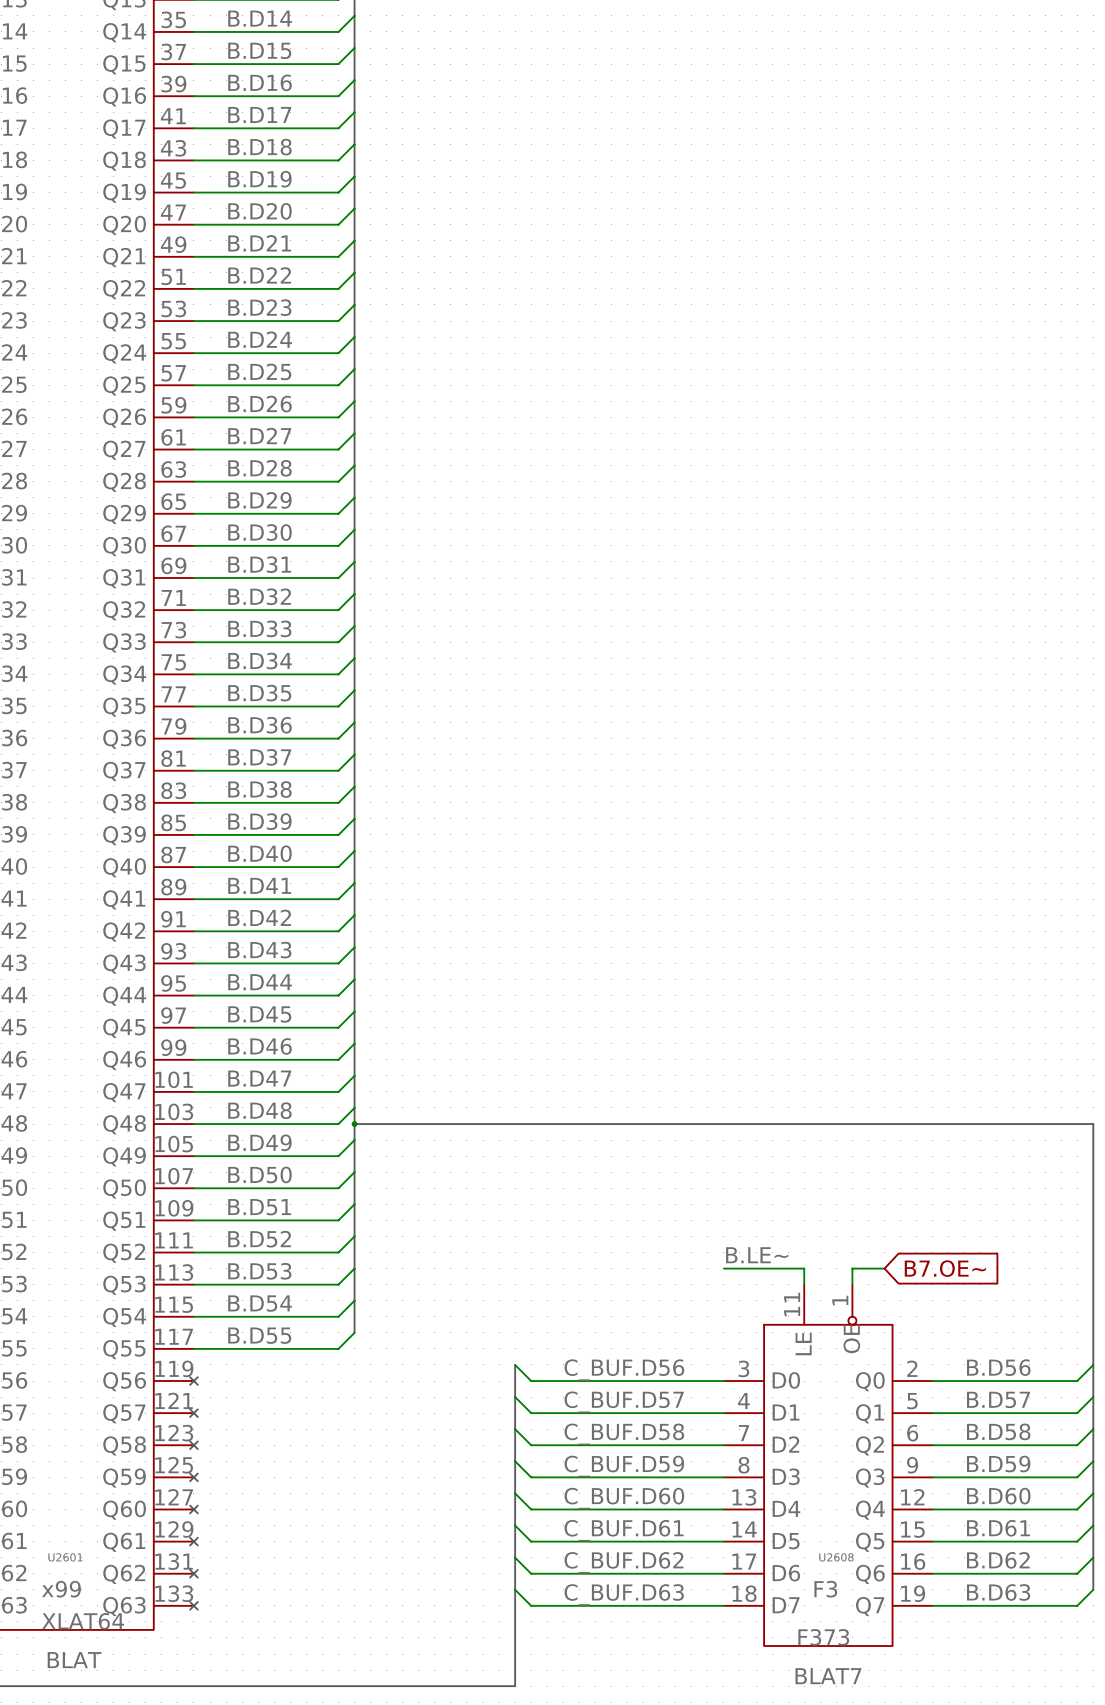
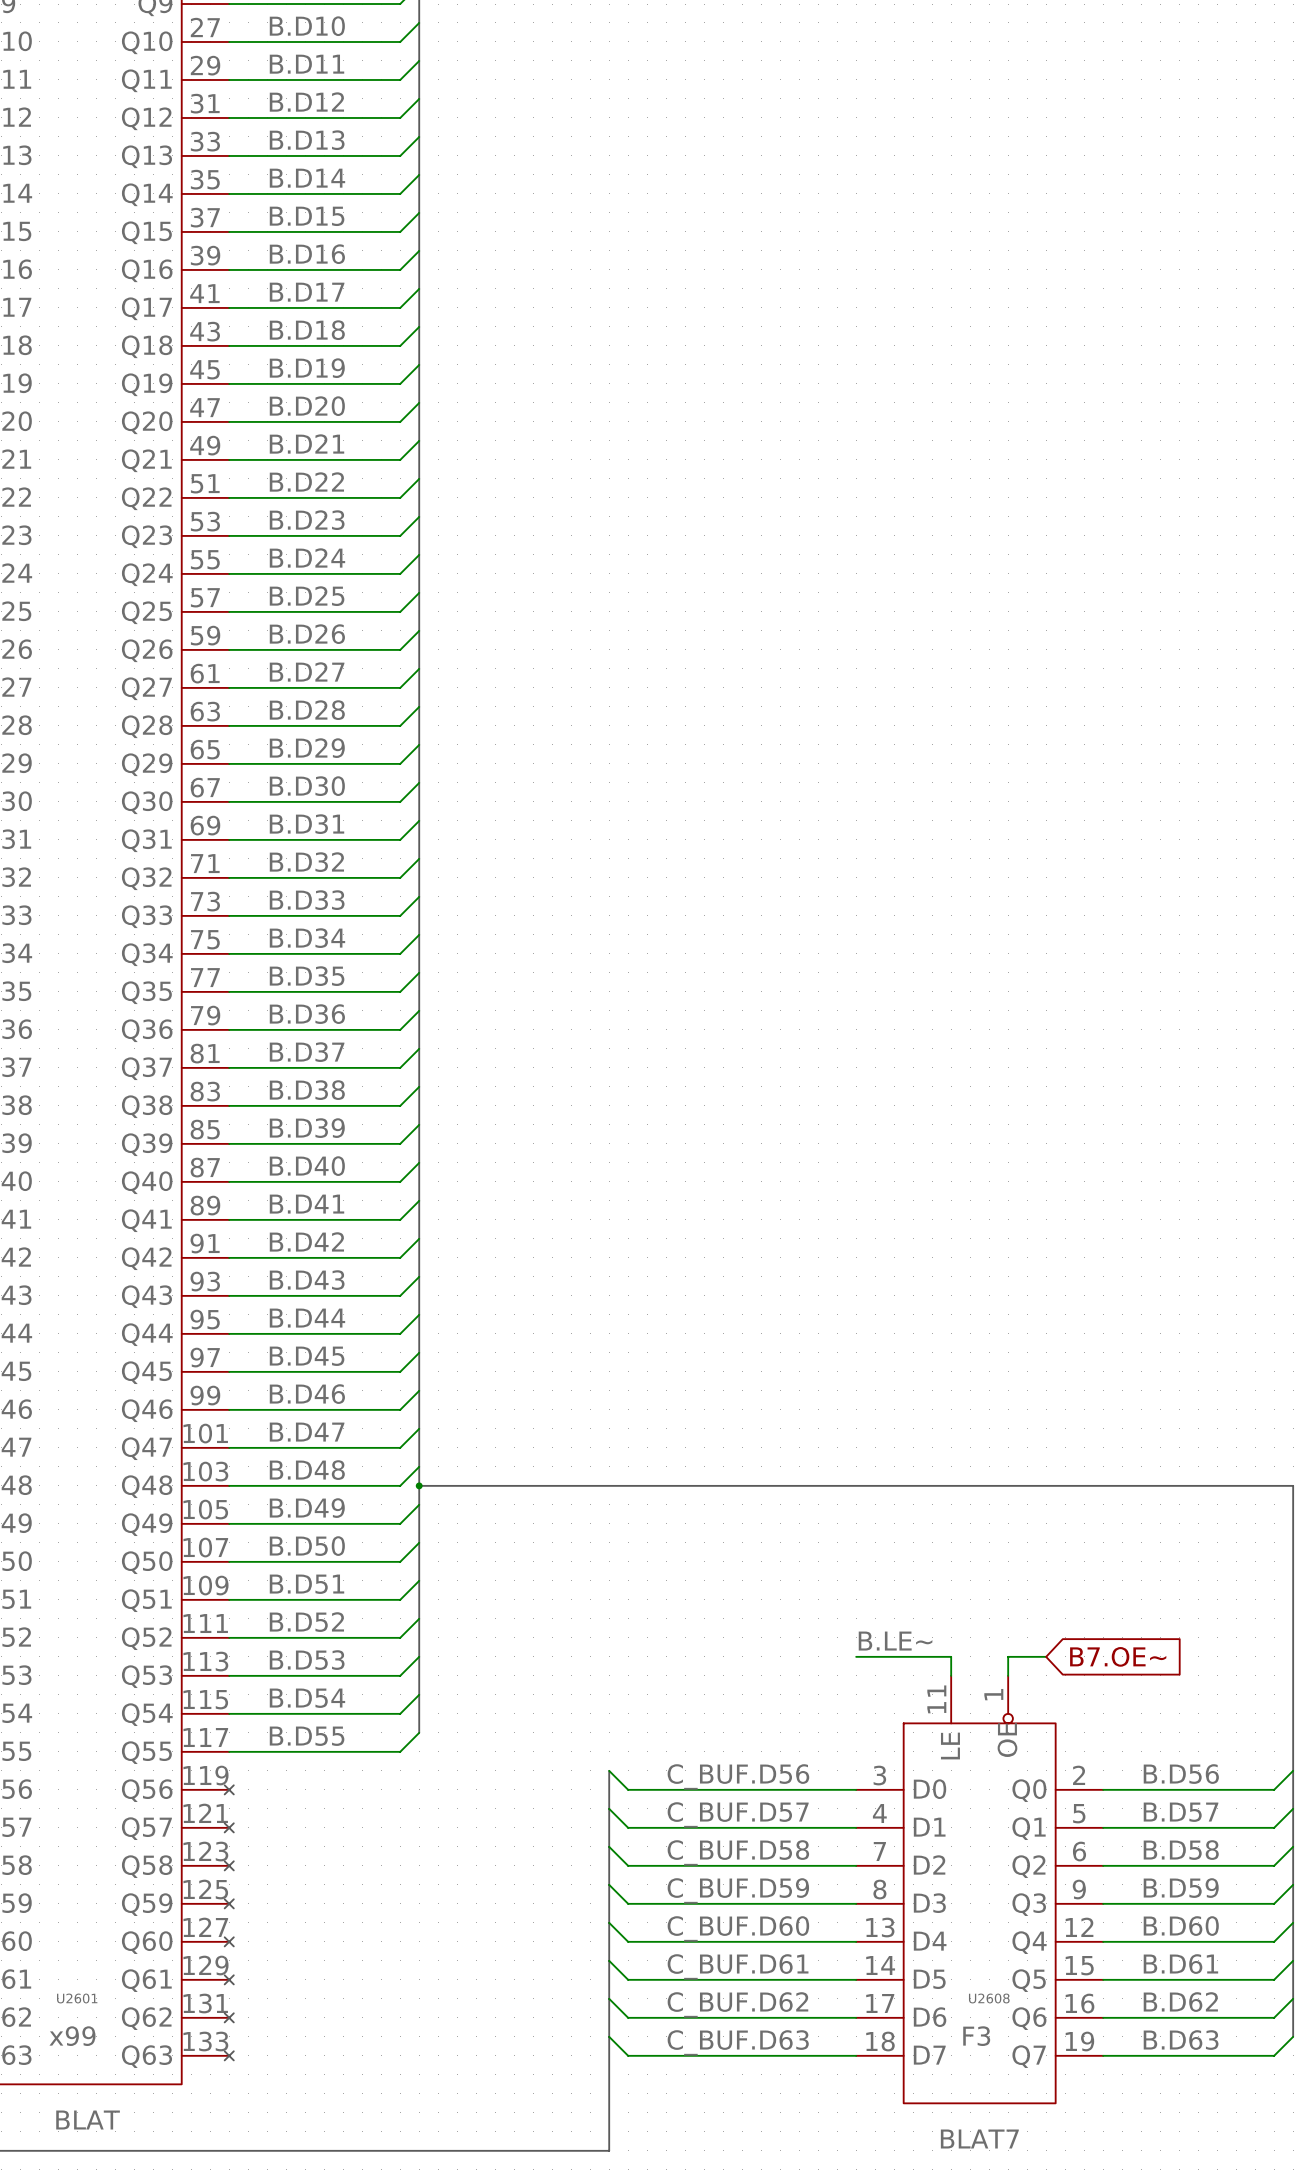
U2601 value: XLAT64 (83, 1621) -> none
U2608 value: F373 (823, 1637) -> none

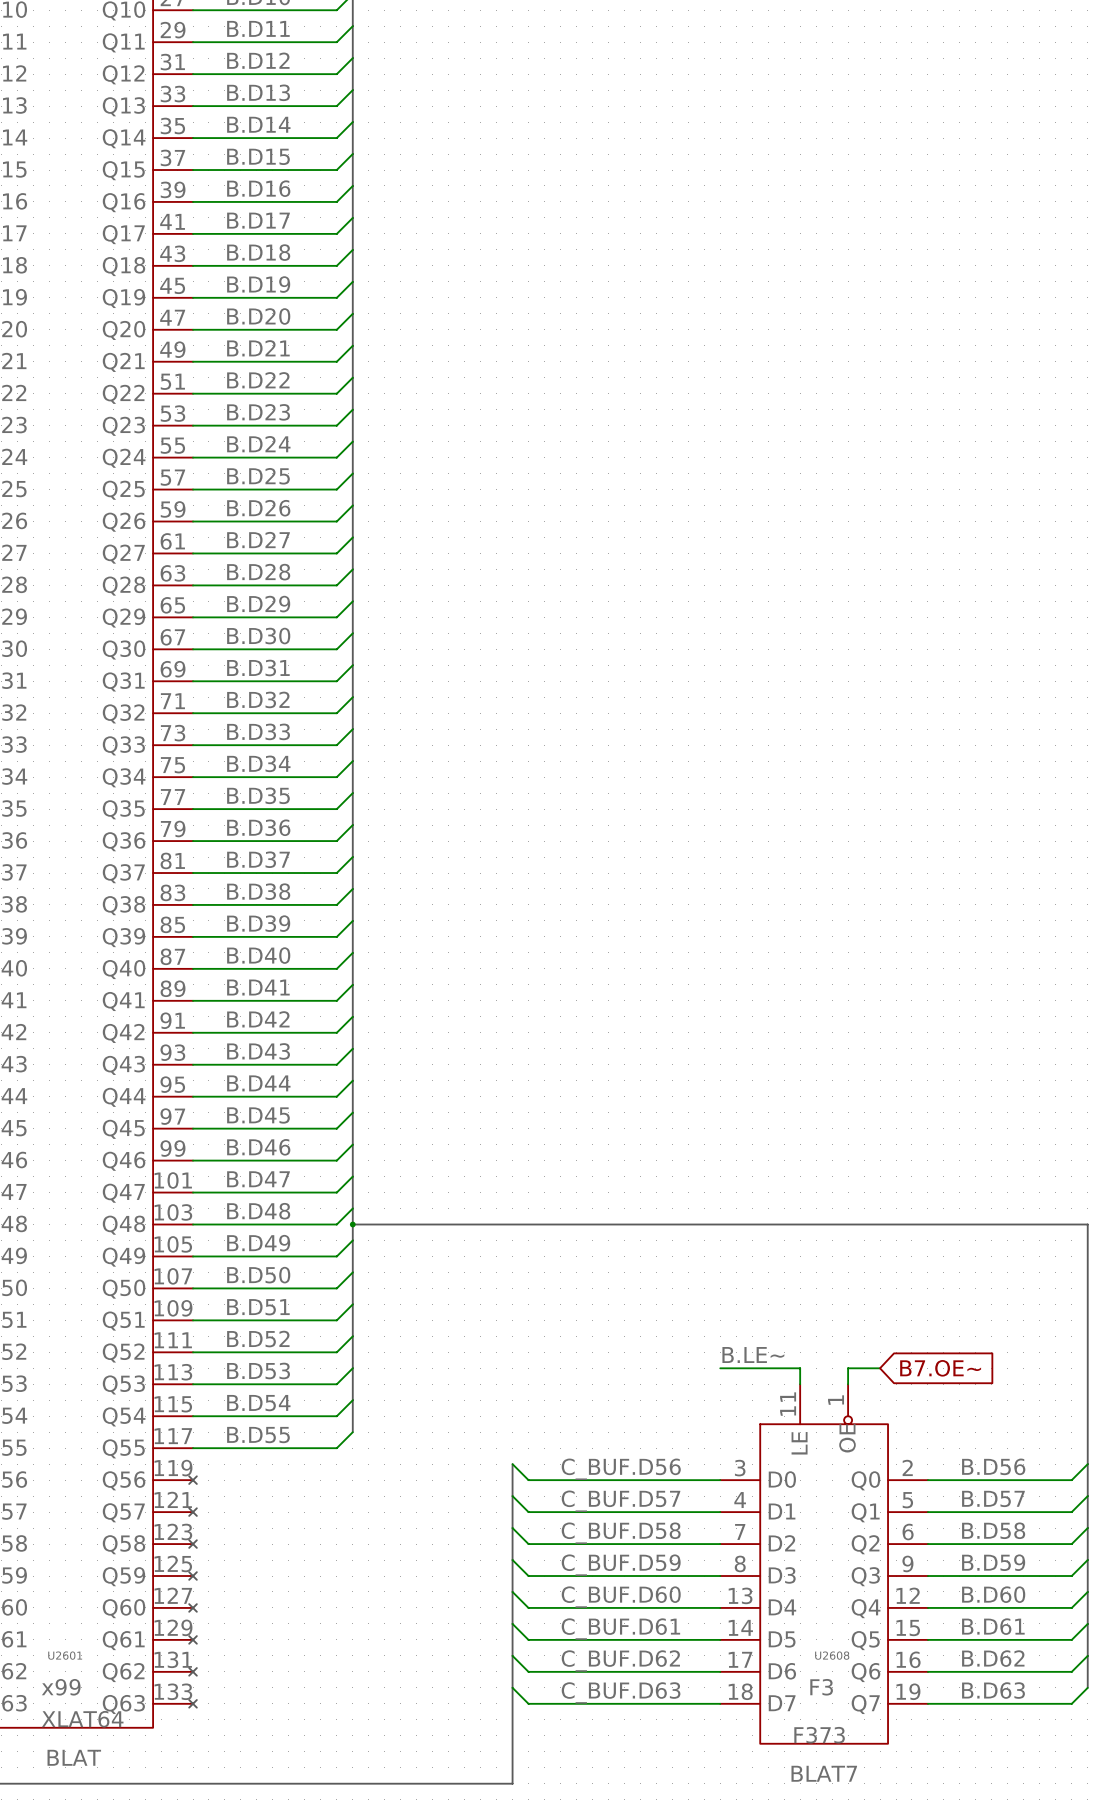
U2601 value: none -> XLAT64 (82, 1719)
U2608 value: none -> F373 (819, 1735)

